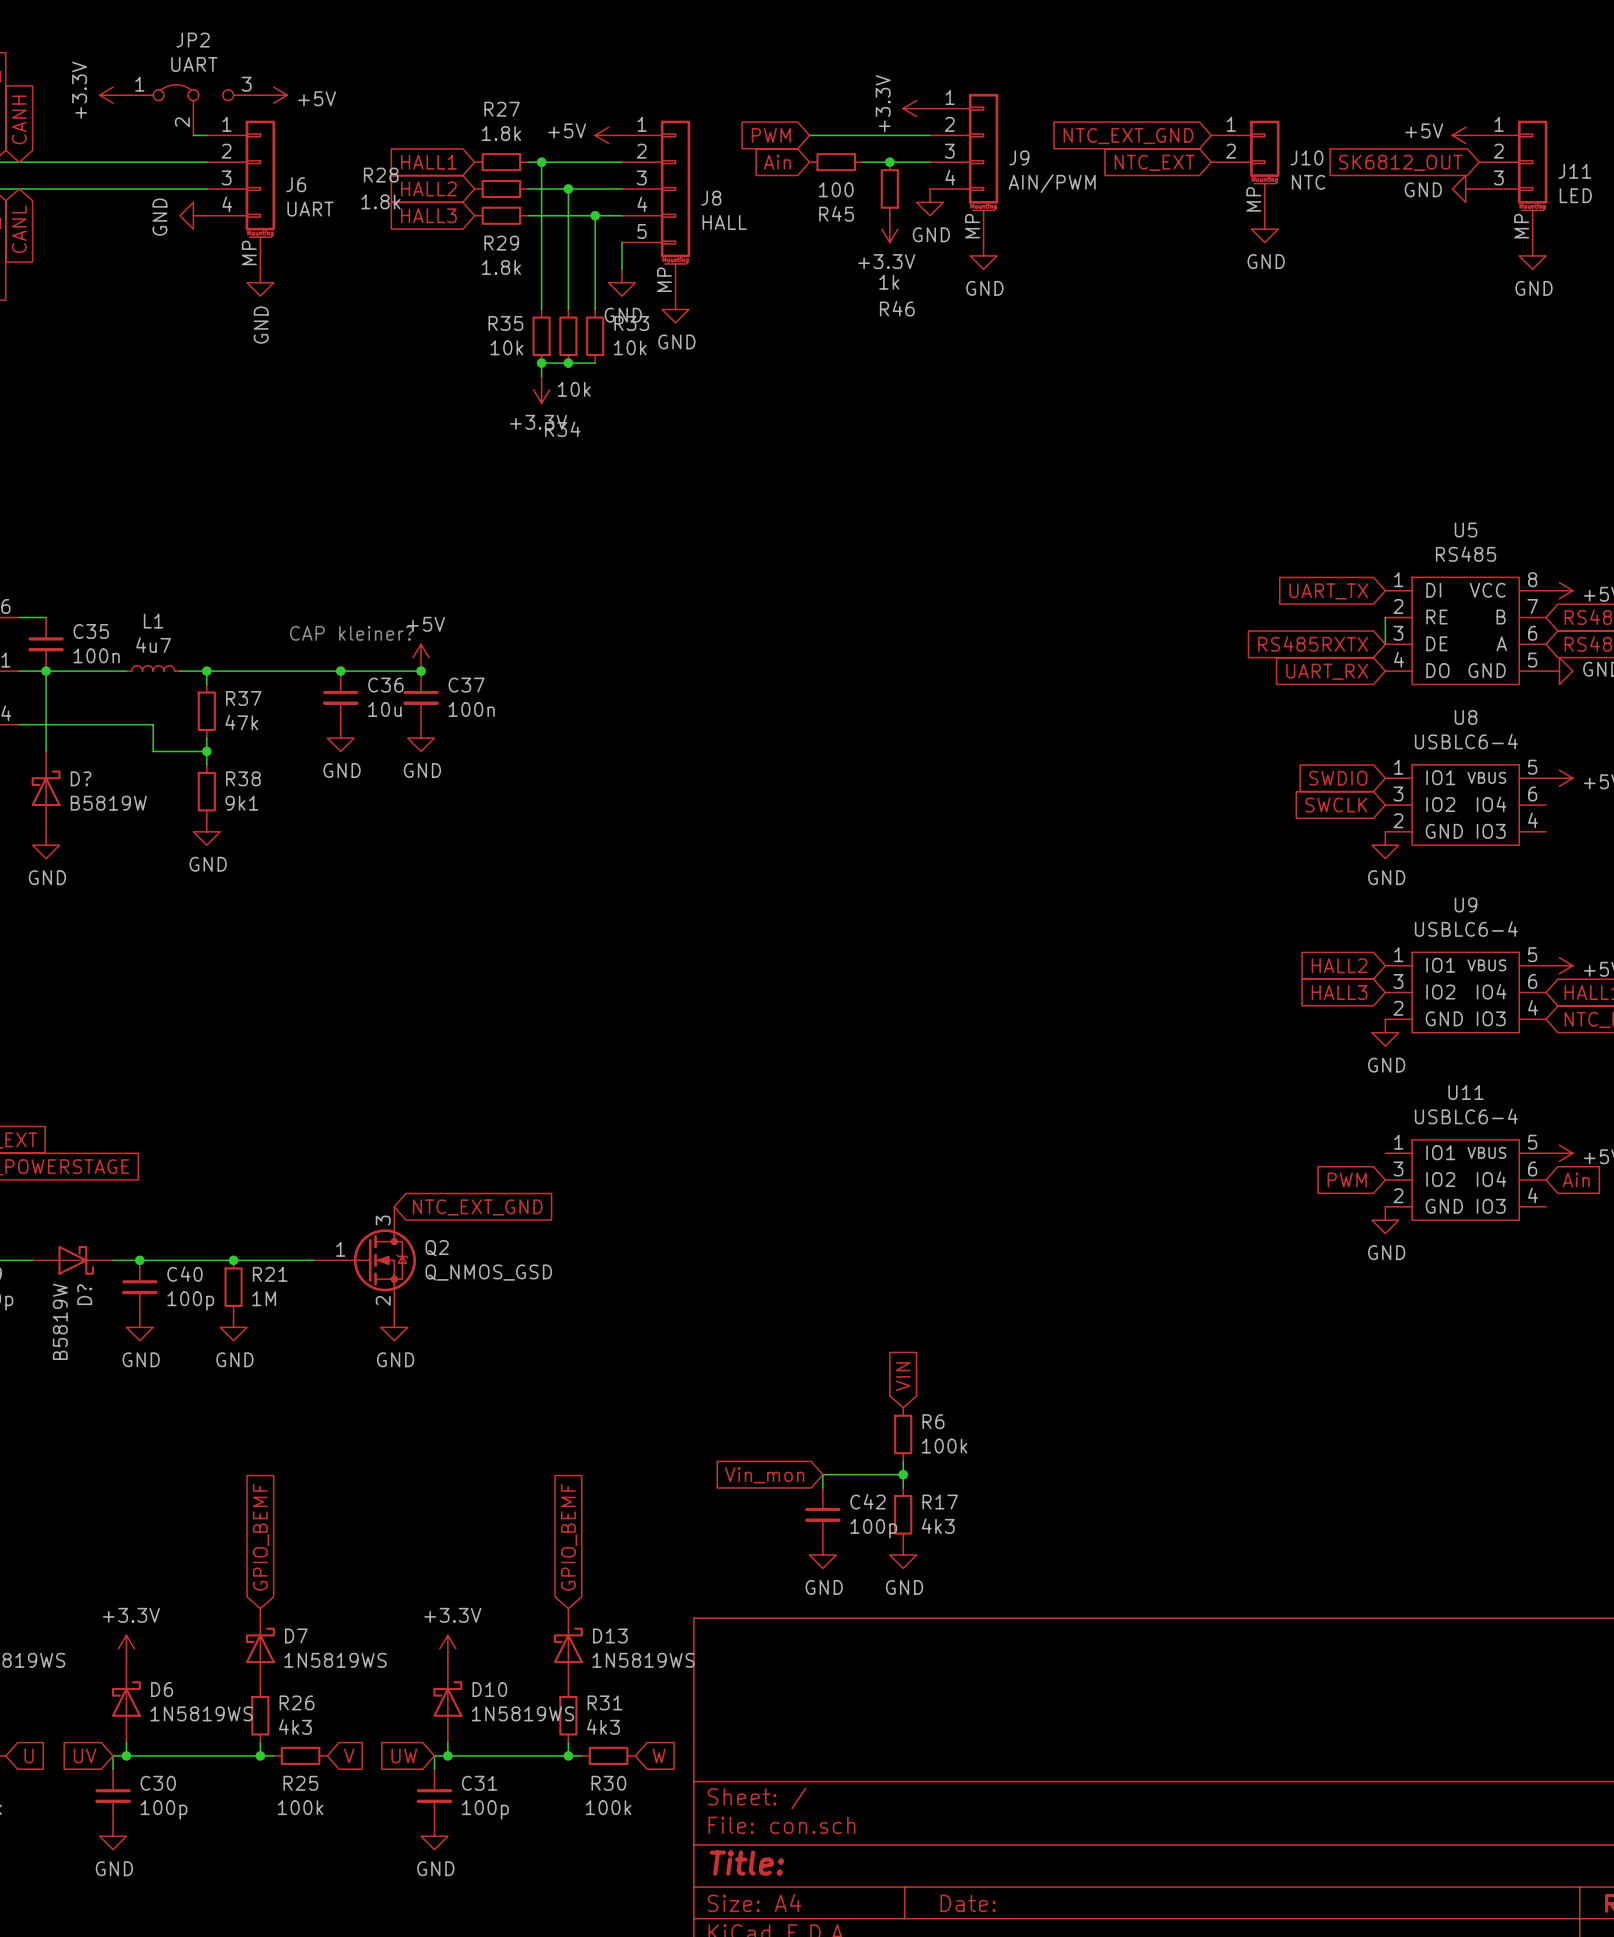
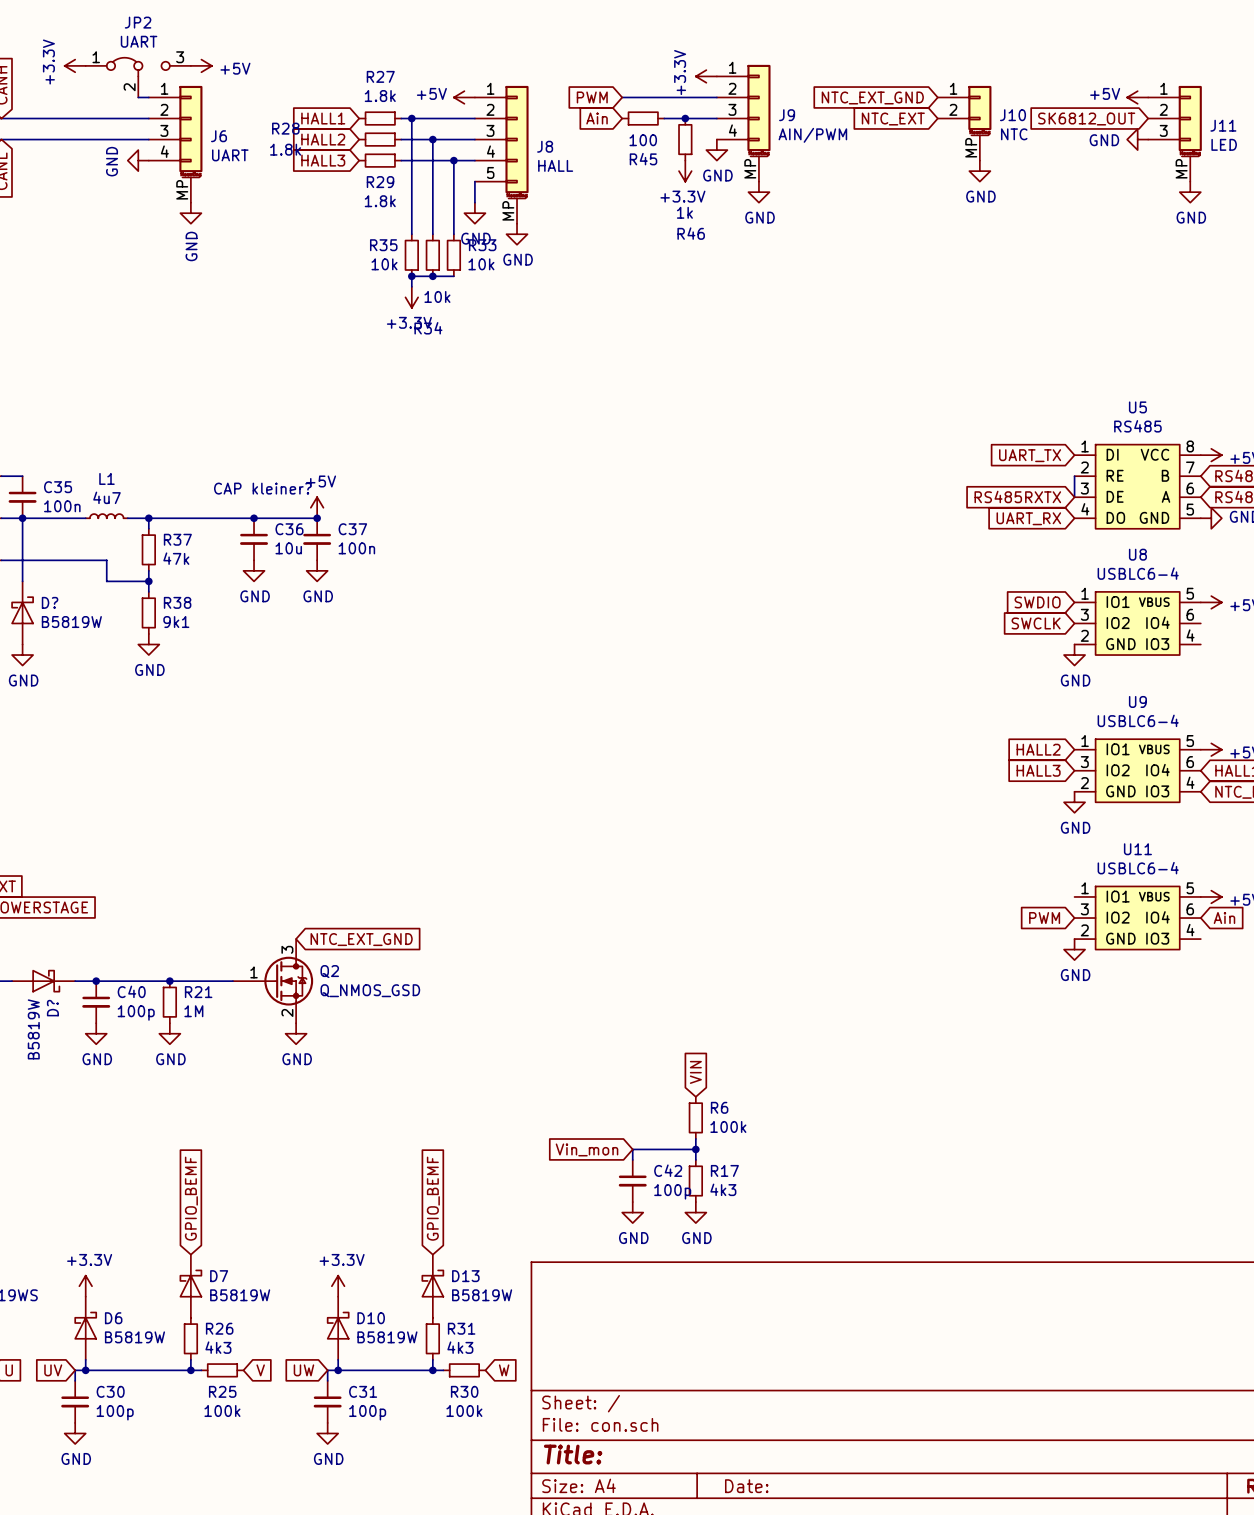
D7 value: 1N5819WS (335, 1660) -> B5819W (240, 1295)
D13 value: 1N5819WS (643, 1660) -> B5819W (482, 1295)
D6 value: 1N5819WS (201, 1713) -> B5819W (134, 1337)
D10 value: 1N5819WS (523, 1713) -> B5819W (387, 1337)

